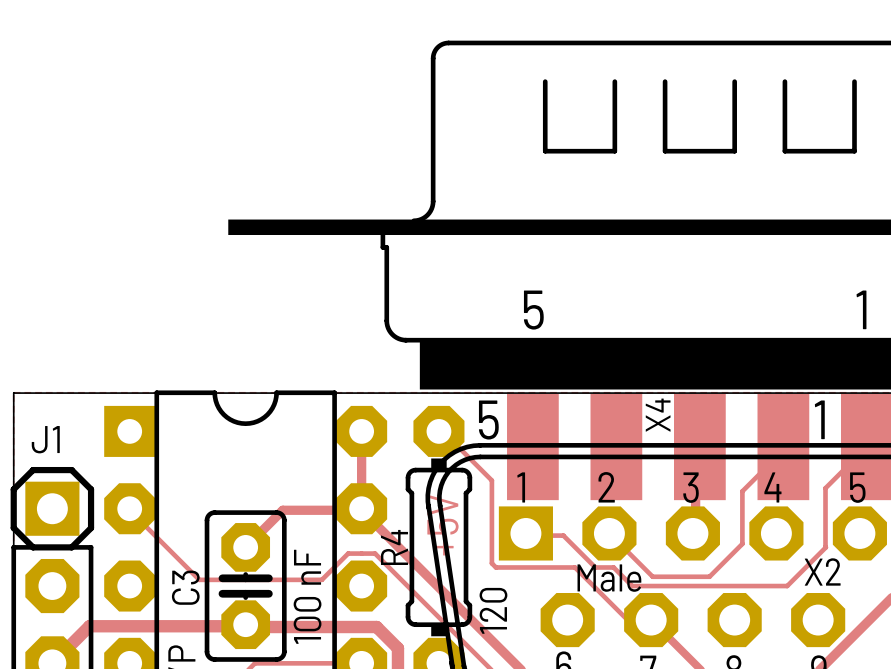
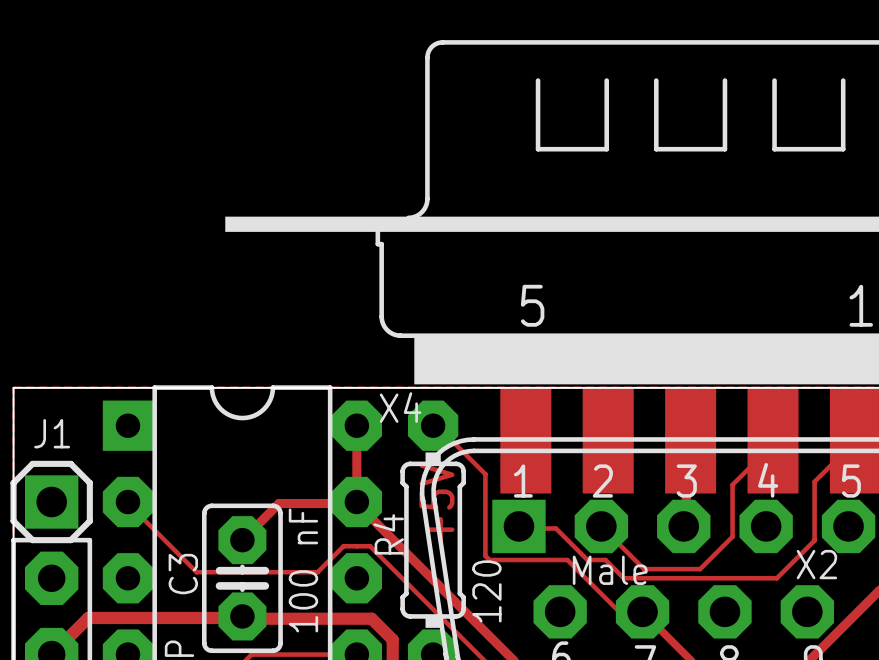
X4 name rotation: 0° (658, 415) -> 90° clockwise (400, 407)
X4 name position: X4 (658, 415) -> X4 (400, 407)
text: 1 (819, 419) -> none
text: 5 (488, 420) -> none

